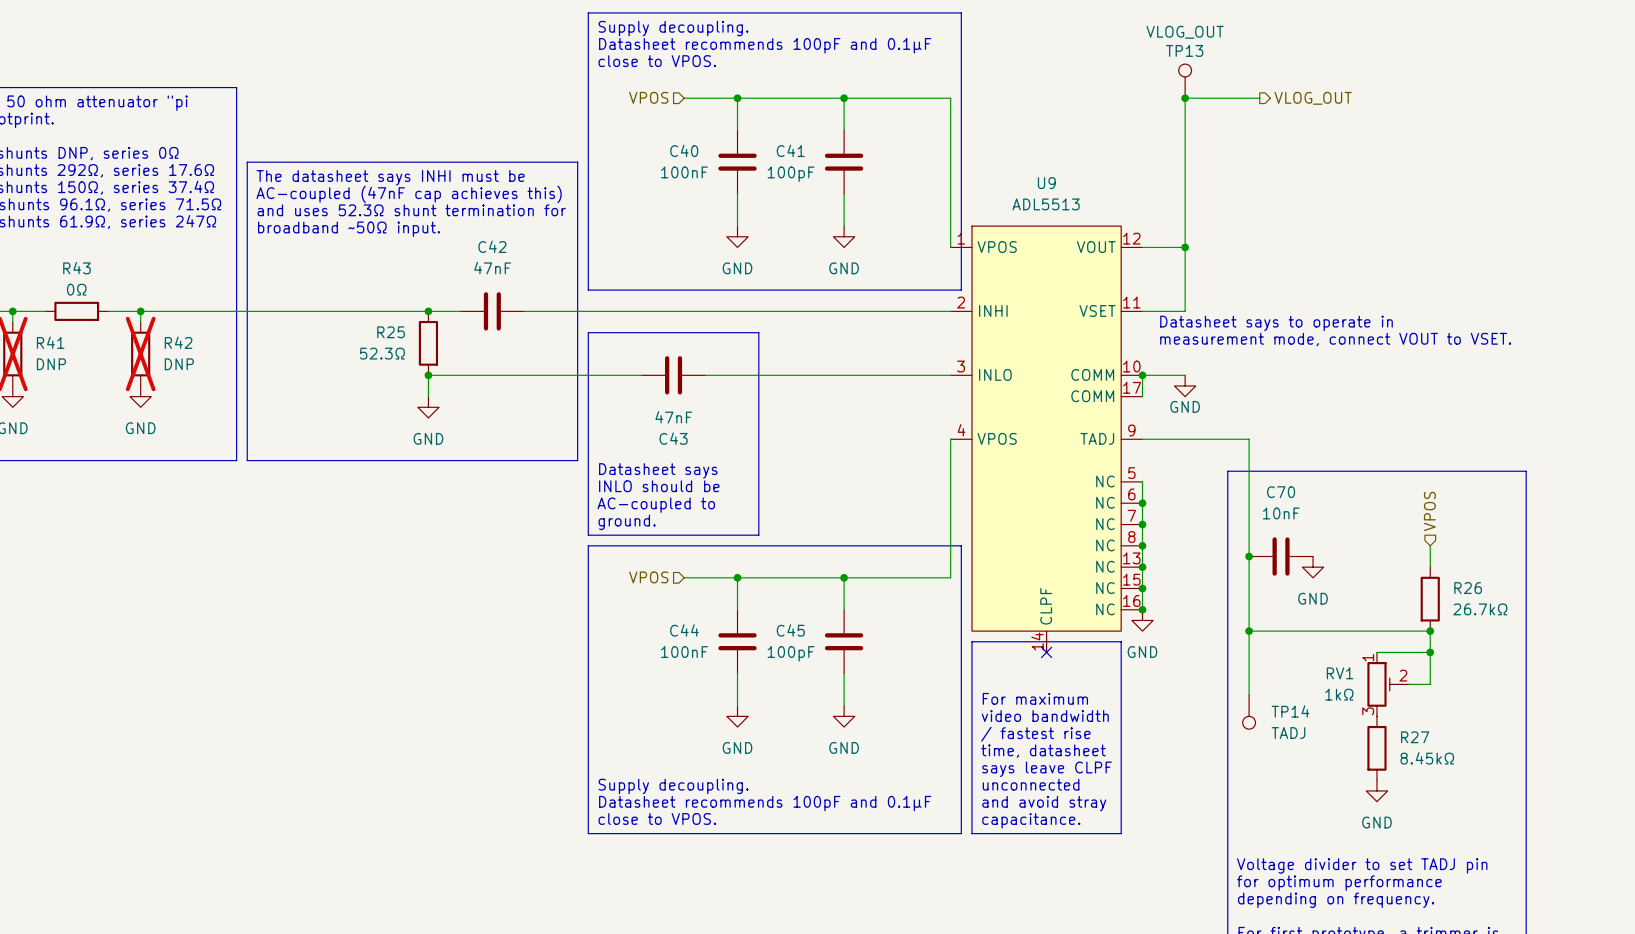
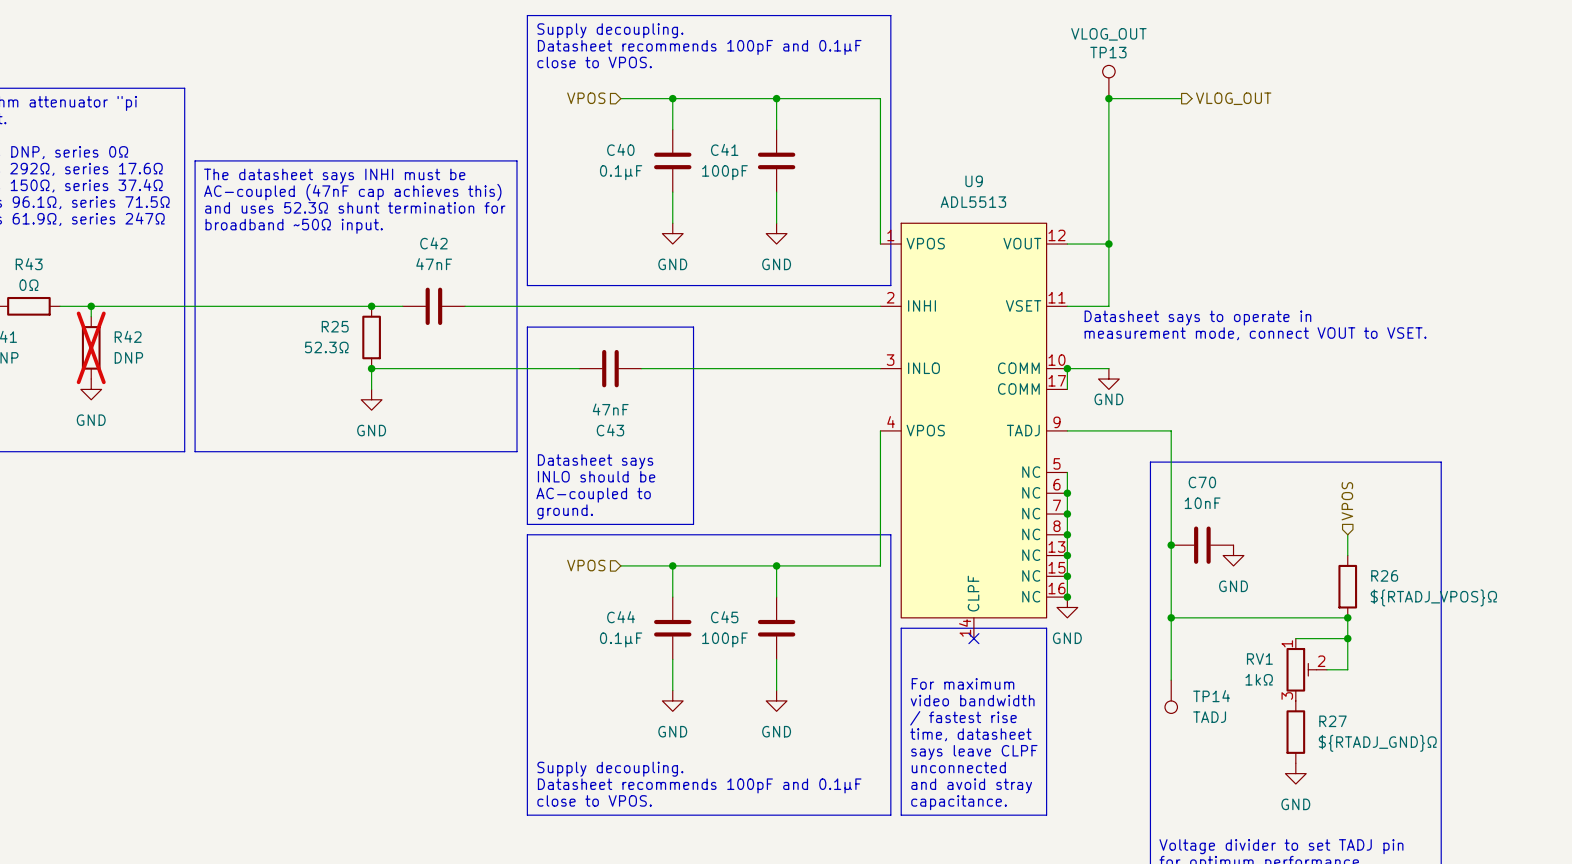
C40 value: 100nF (684, 172) -> 0.1µF (621, 172)
R26 value: 26.7kΩ (1480, 609) -> ${RTADJ_VPOS}Ω (1433, 597)
C44 value: 100nF (684, 652) -> 0.1µF (621, 639)
R27 value: 8.45kΩ (1427, 758) -> ${RTADJ_GND}Ω (1377, 743)

